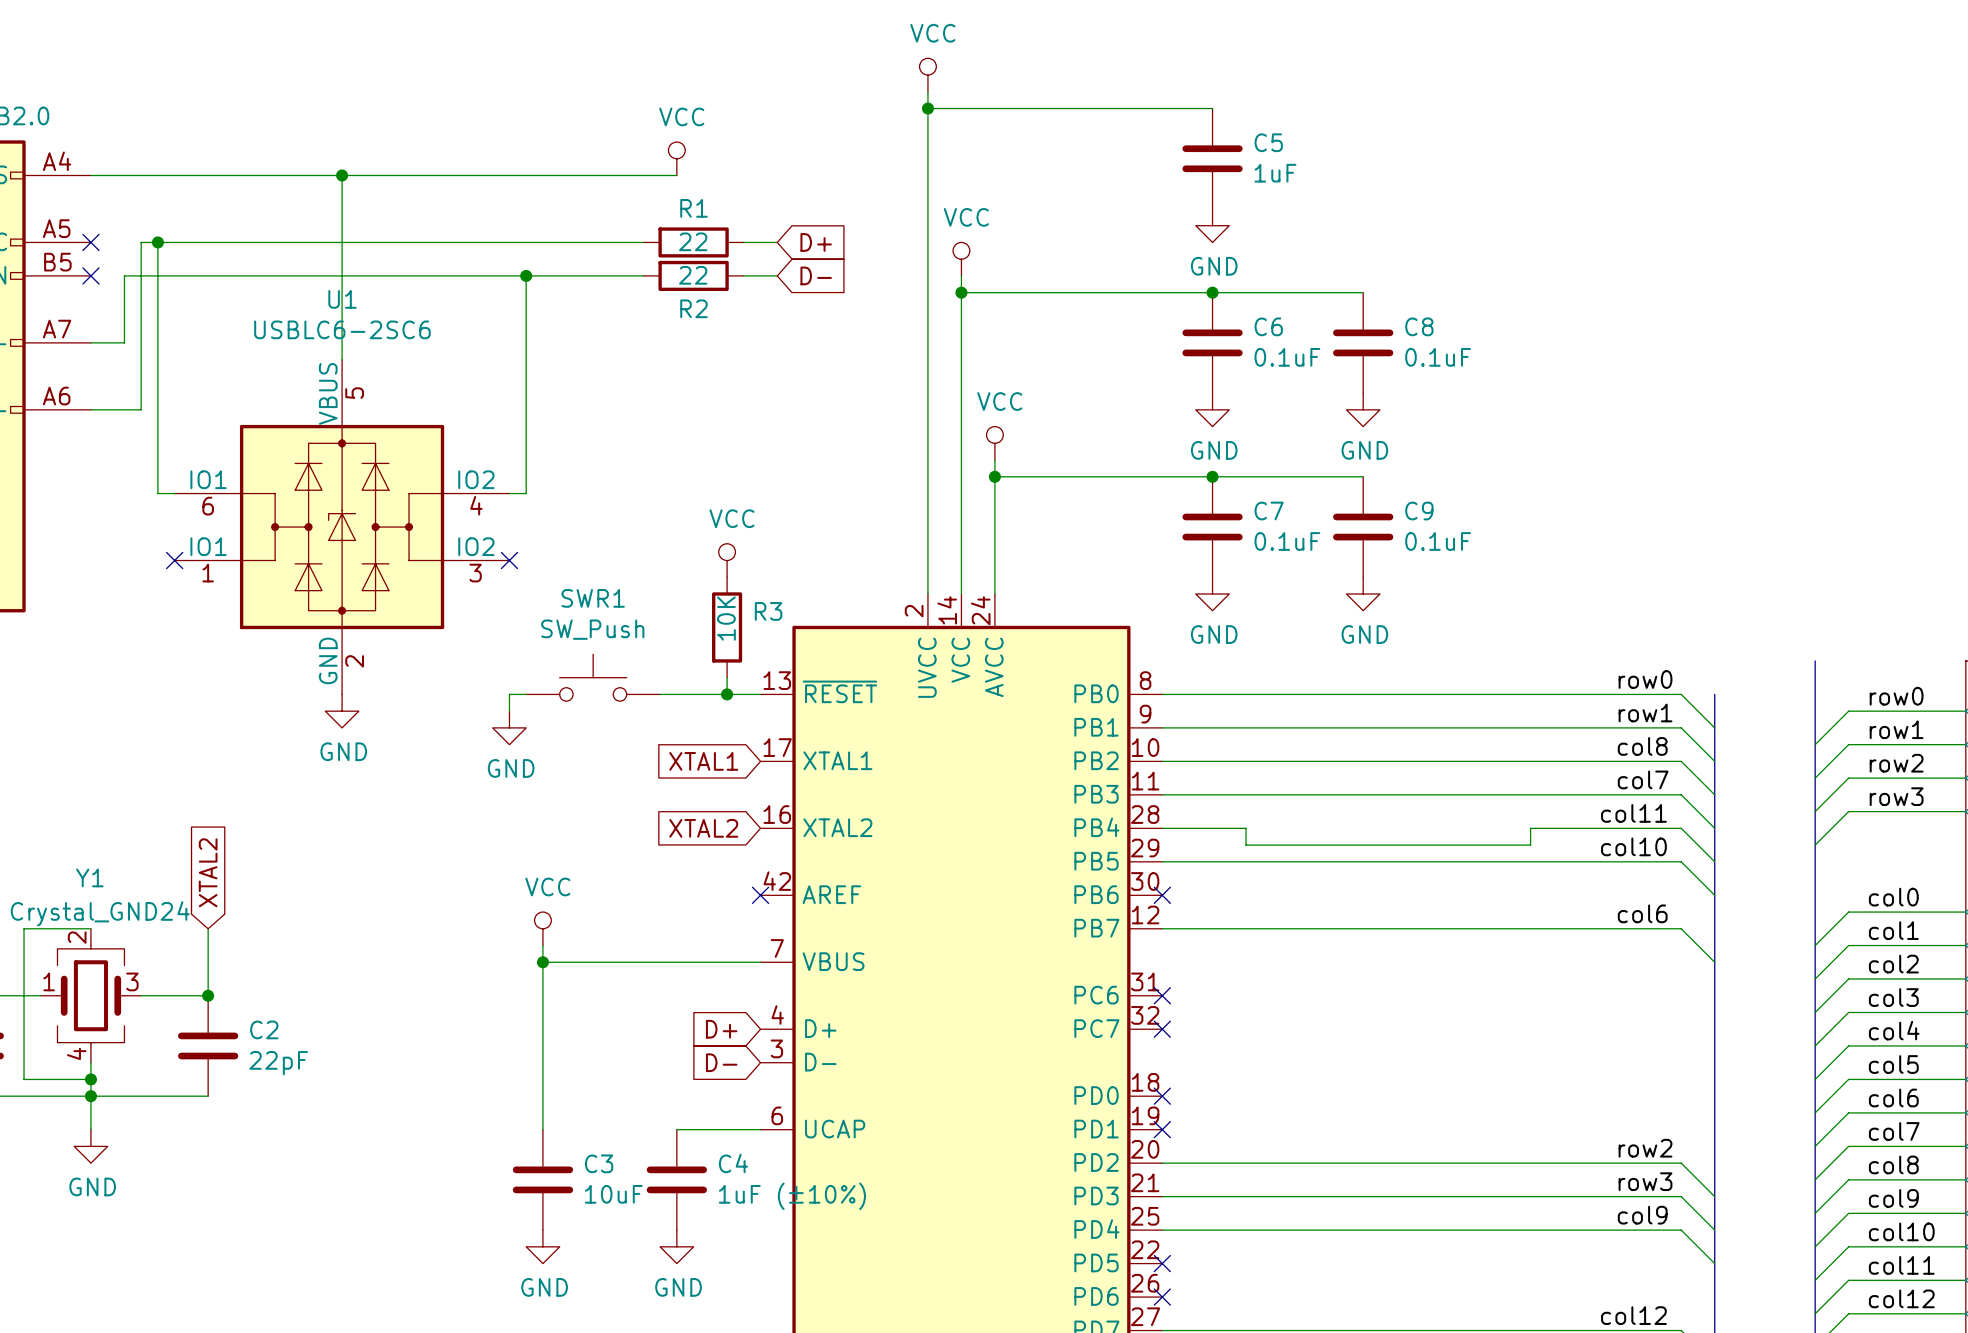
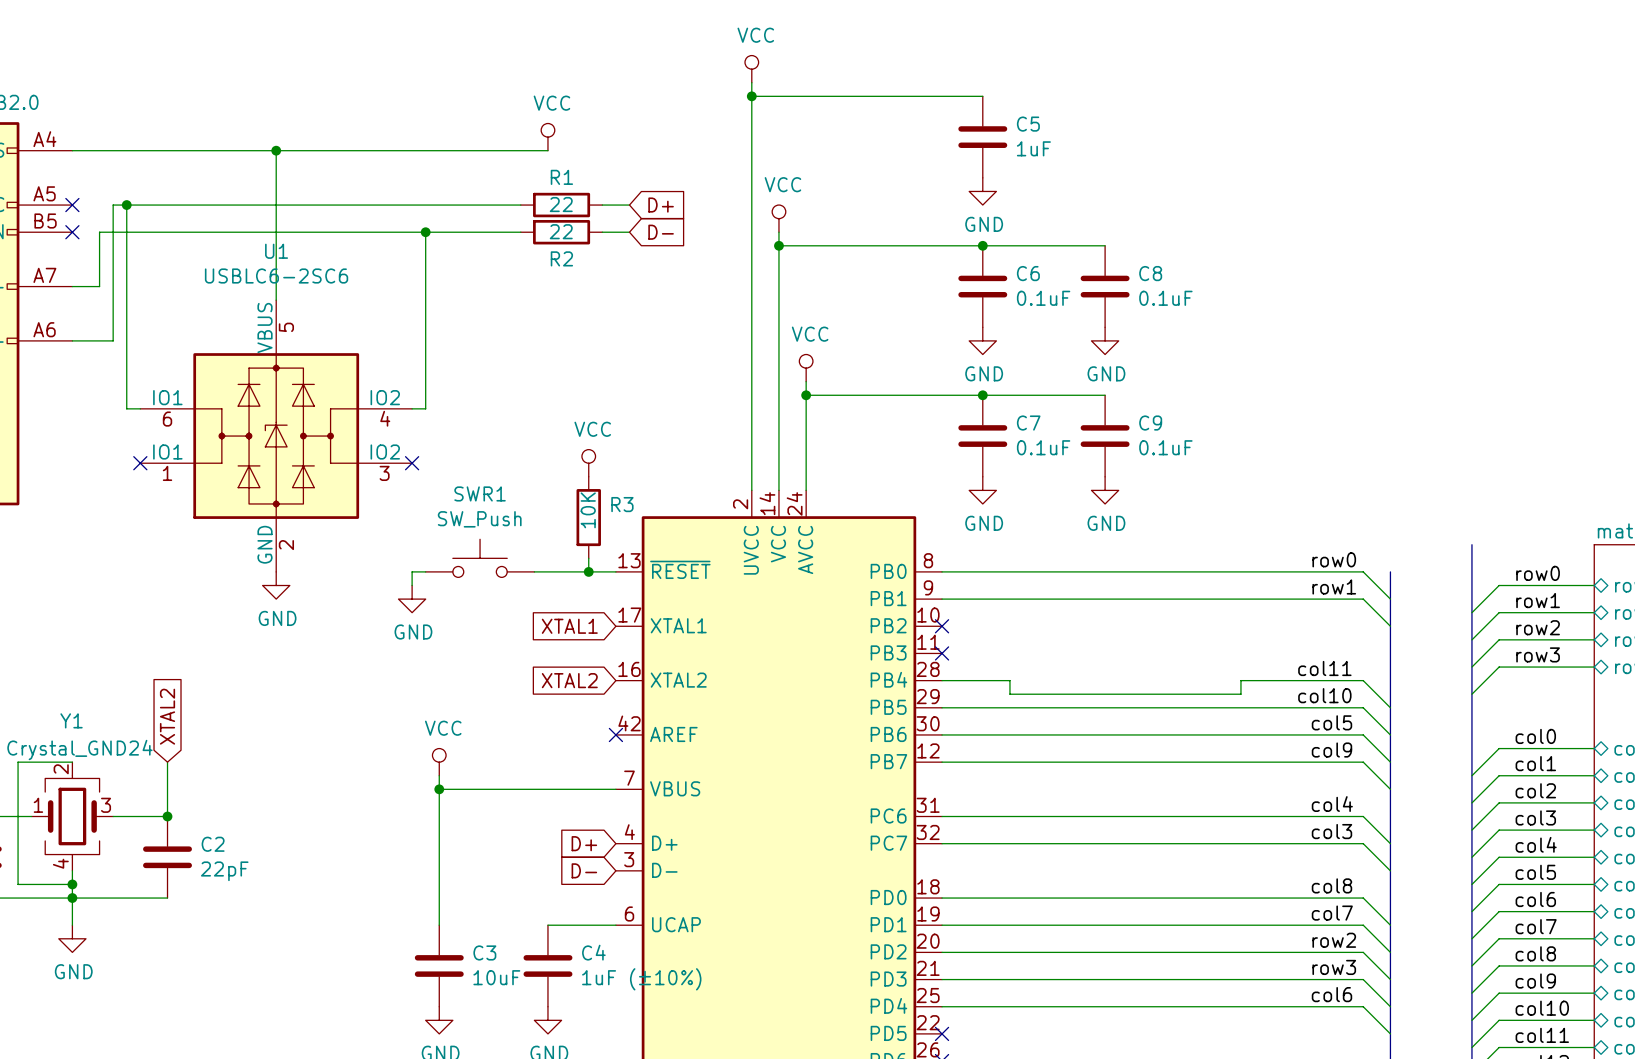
label: col8 (1642, 746) -> none
wire: (1162, 761) (1681, 761) (1714, 794) -> (942, 816) (1363, 816) (1390, 843)
no-connect mark: none -> (942, 626)
label: col7 (1643, 779) -> none
wire: (1162, 794) (1681, 794) (1714, 828) -> (942, 843) (1363, 843) (1390, 870)
no-connect mark: none -> (942, 653)
label: none -> col5 (1331, 722)
wire: none -> (942, 734) (1363, 734) (1390, 762)
no-connect mark: (1162, 895) -> none
label: col6 (1642, 913) -> col9 (1331, 750)
label: none -> col4 (1332, 804)
no-connect mark: (1162, 995) -> none
label: none -> col3 (1331, 831)
no-connect mark: (1162, 1029) -> none
label: none -> col8 (1331, 885)
wire: none -> (942, 898) (1363, 898) (1390, 925)
no-connect mark: (1162, 1096) -> none
label: none -> col7 (1332, 913)
wire: none -> (942, 925) (1363, 925) (1390, 952)
no-connect mark: (1162, 1129) -> none
label: col9 (1642, 1215) -> col6 (1331, 994)

